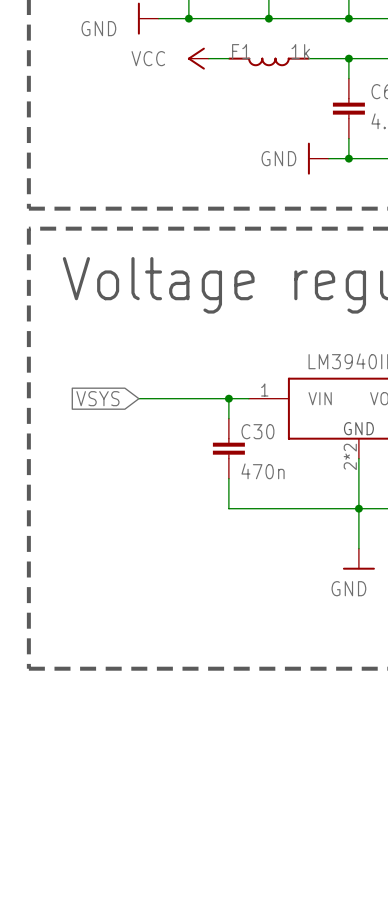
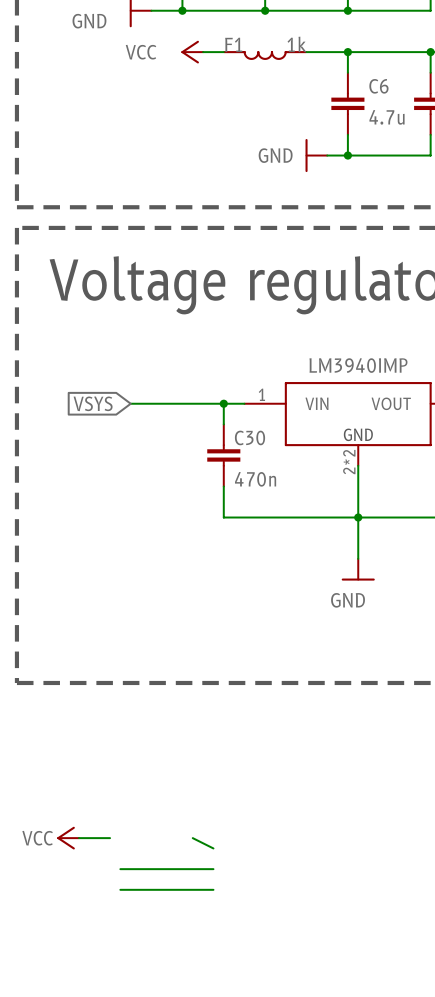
power symbol: none -> VCC (68, 838)
wire: none -> (79, 838) (110, 838)
wire: none -> (192, 838) (213, 848)
wire: none -> (120, 869) (213, 869)
wire: none -> (120, 889) (213, 889)

